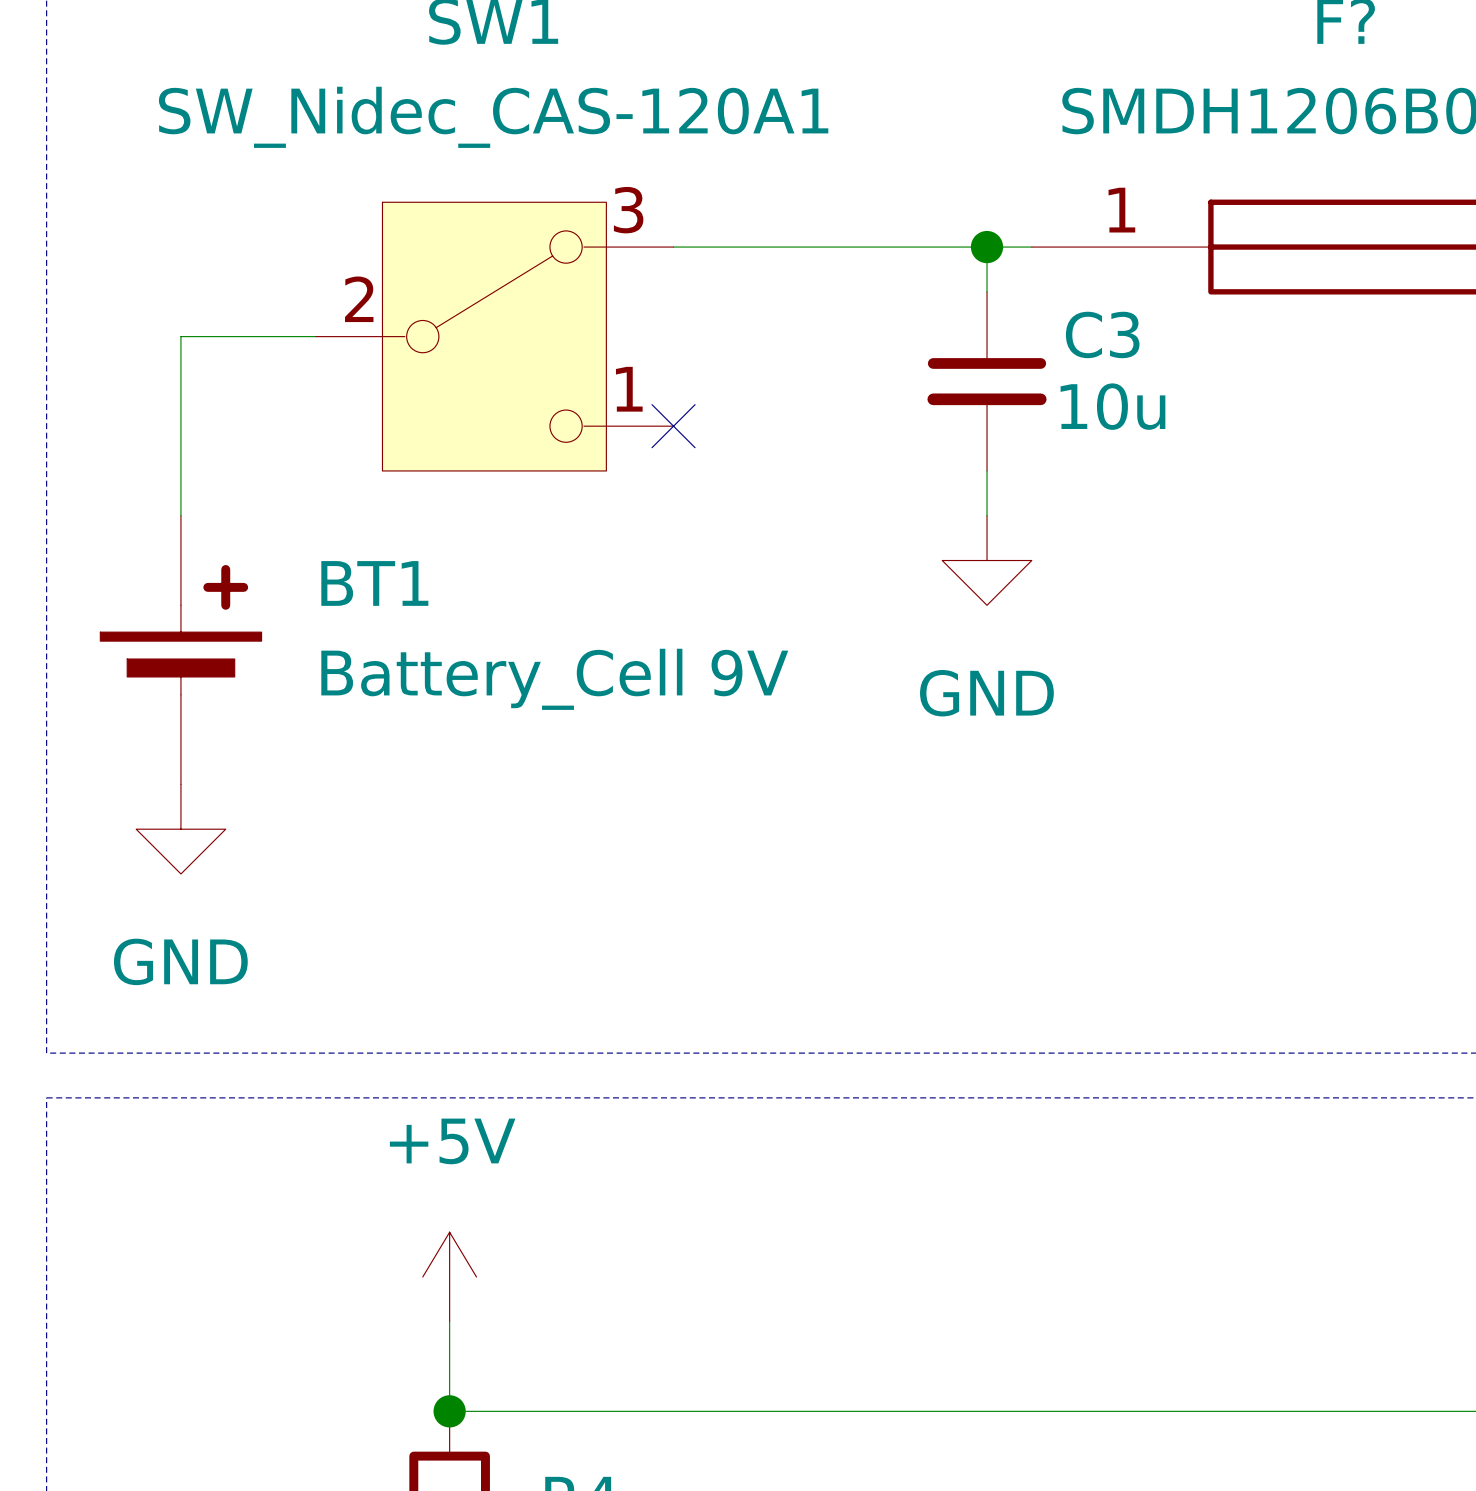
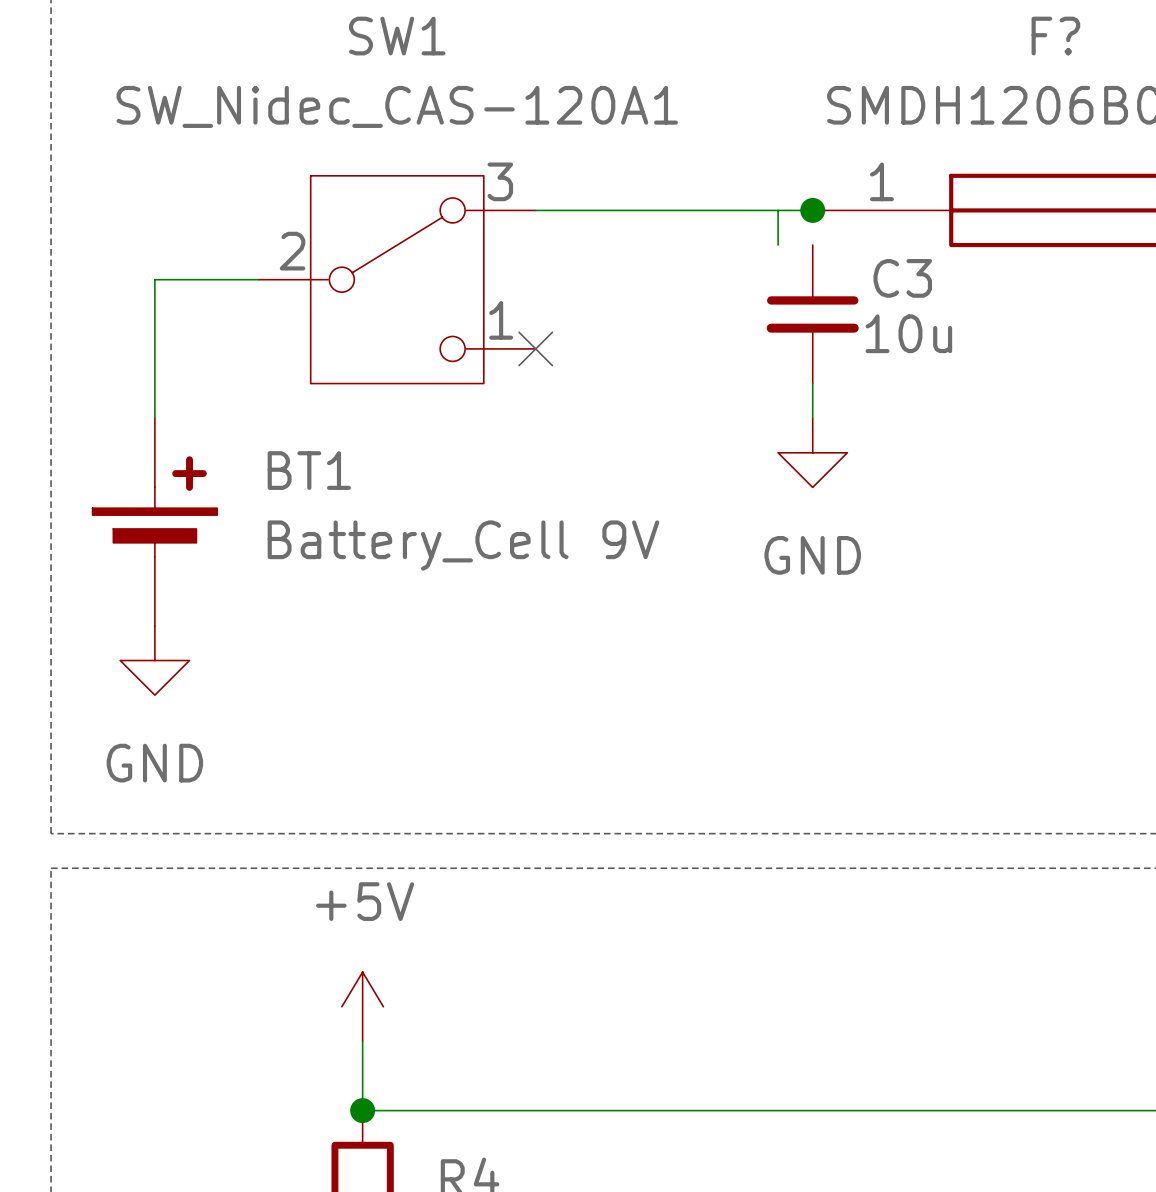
junction position: (987, 247) -> (812, 210)
C3 position: (987, 381) -> (812, 314)
wire: (987, 470) (987, 515) -> (812, 383) (812, 418)
power symbol position: GND (987, 560) -> GND (812, 452)

